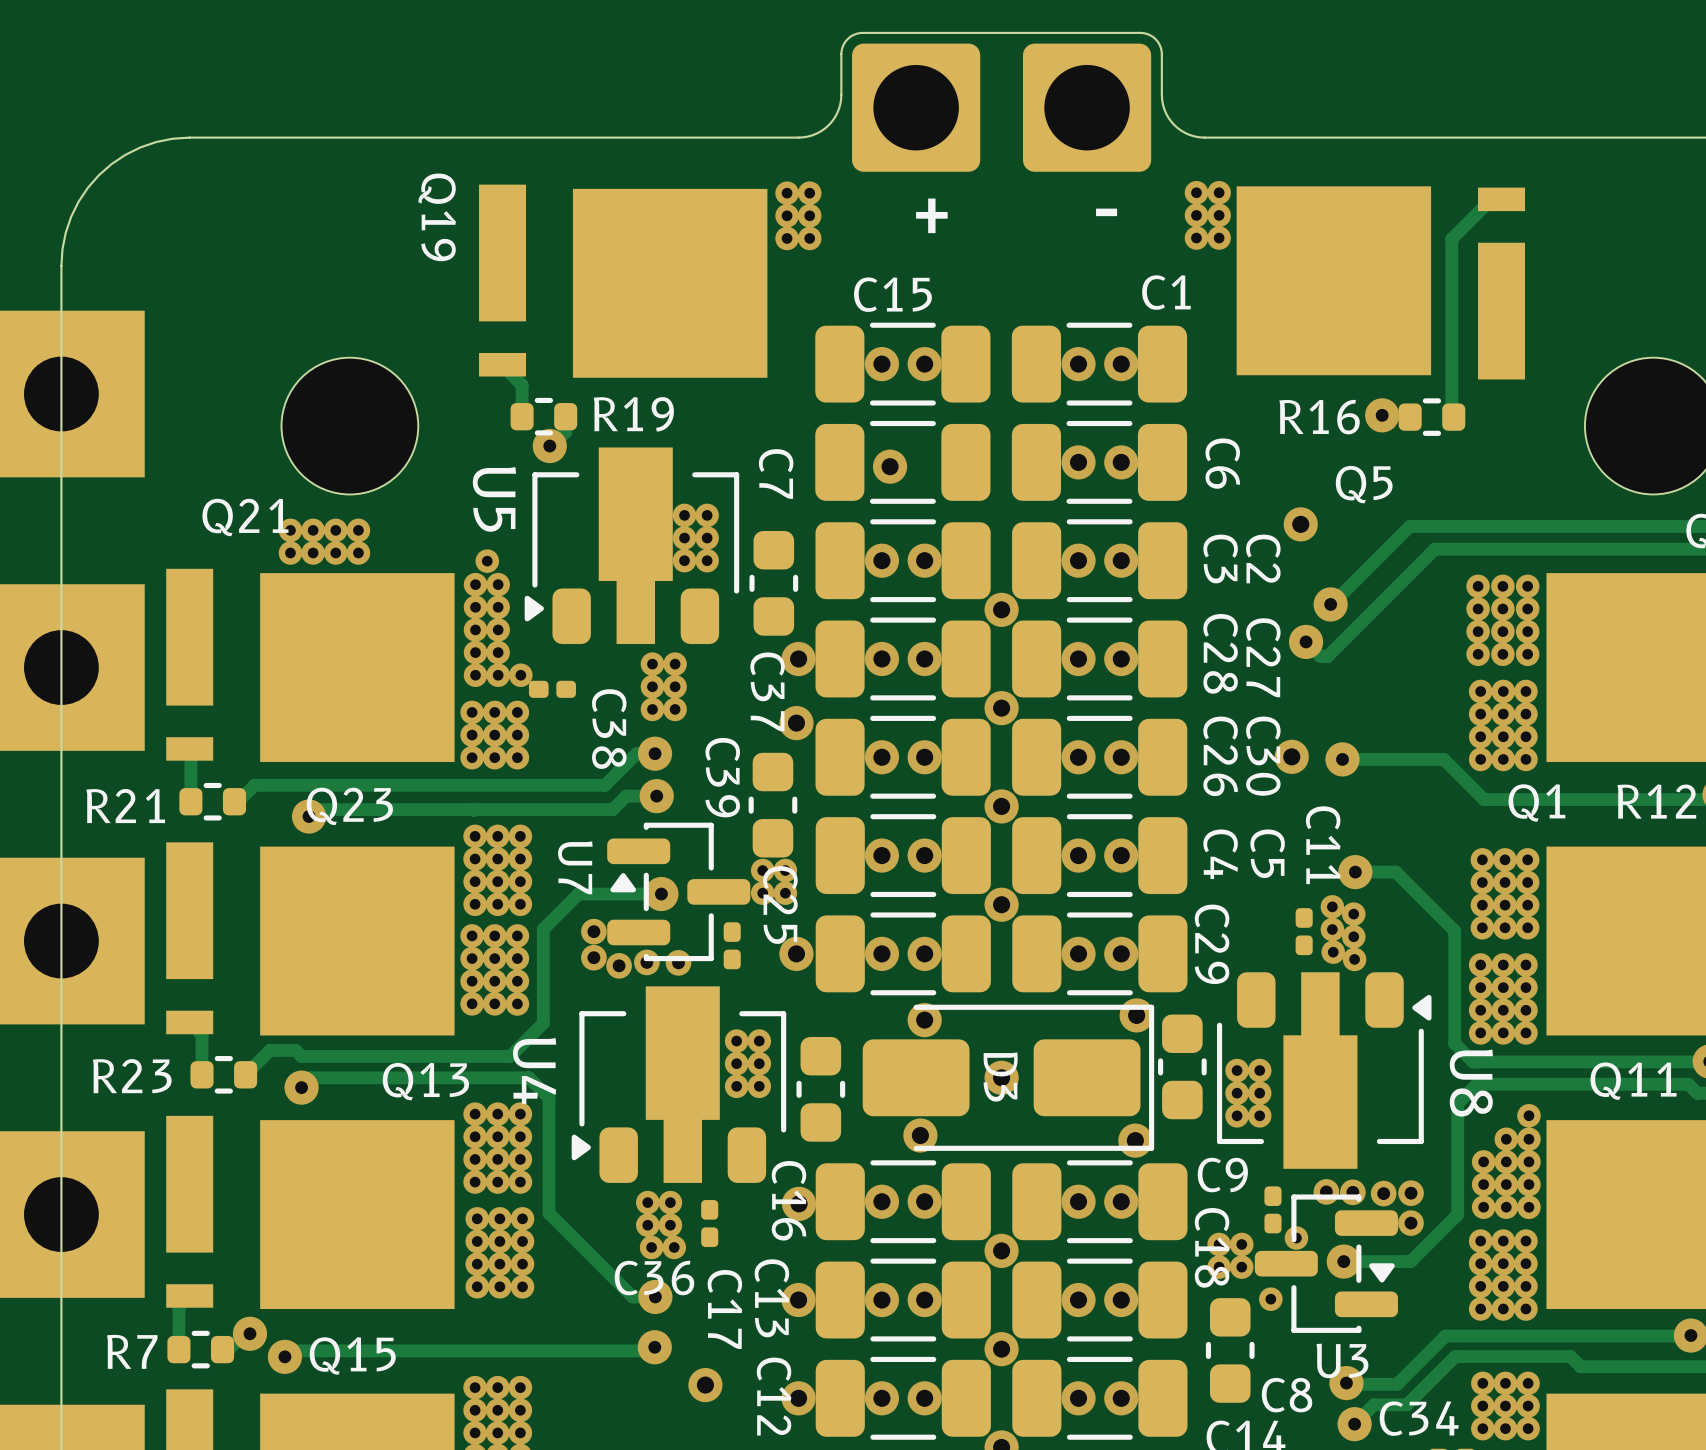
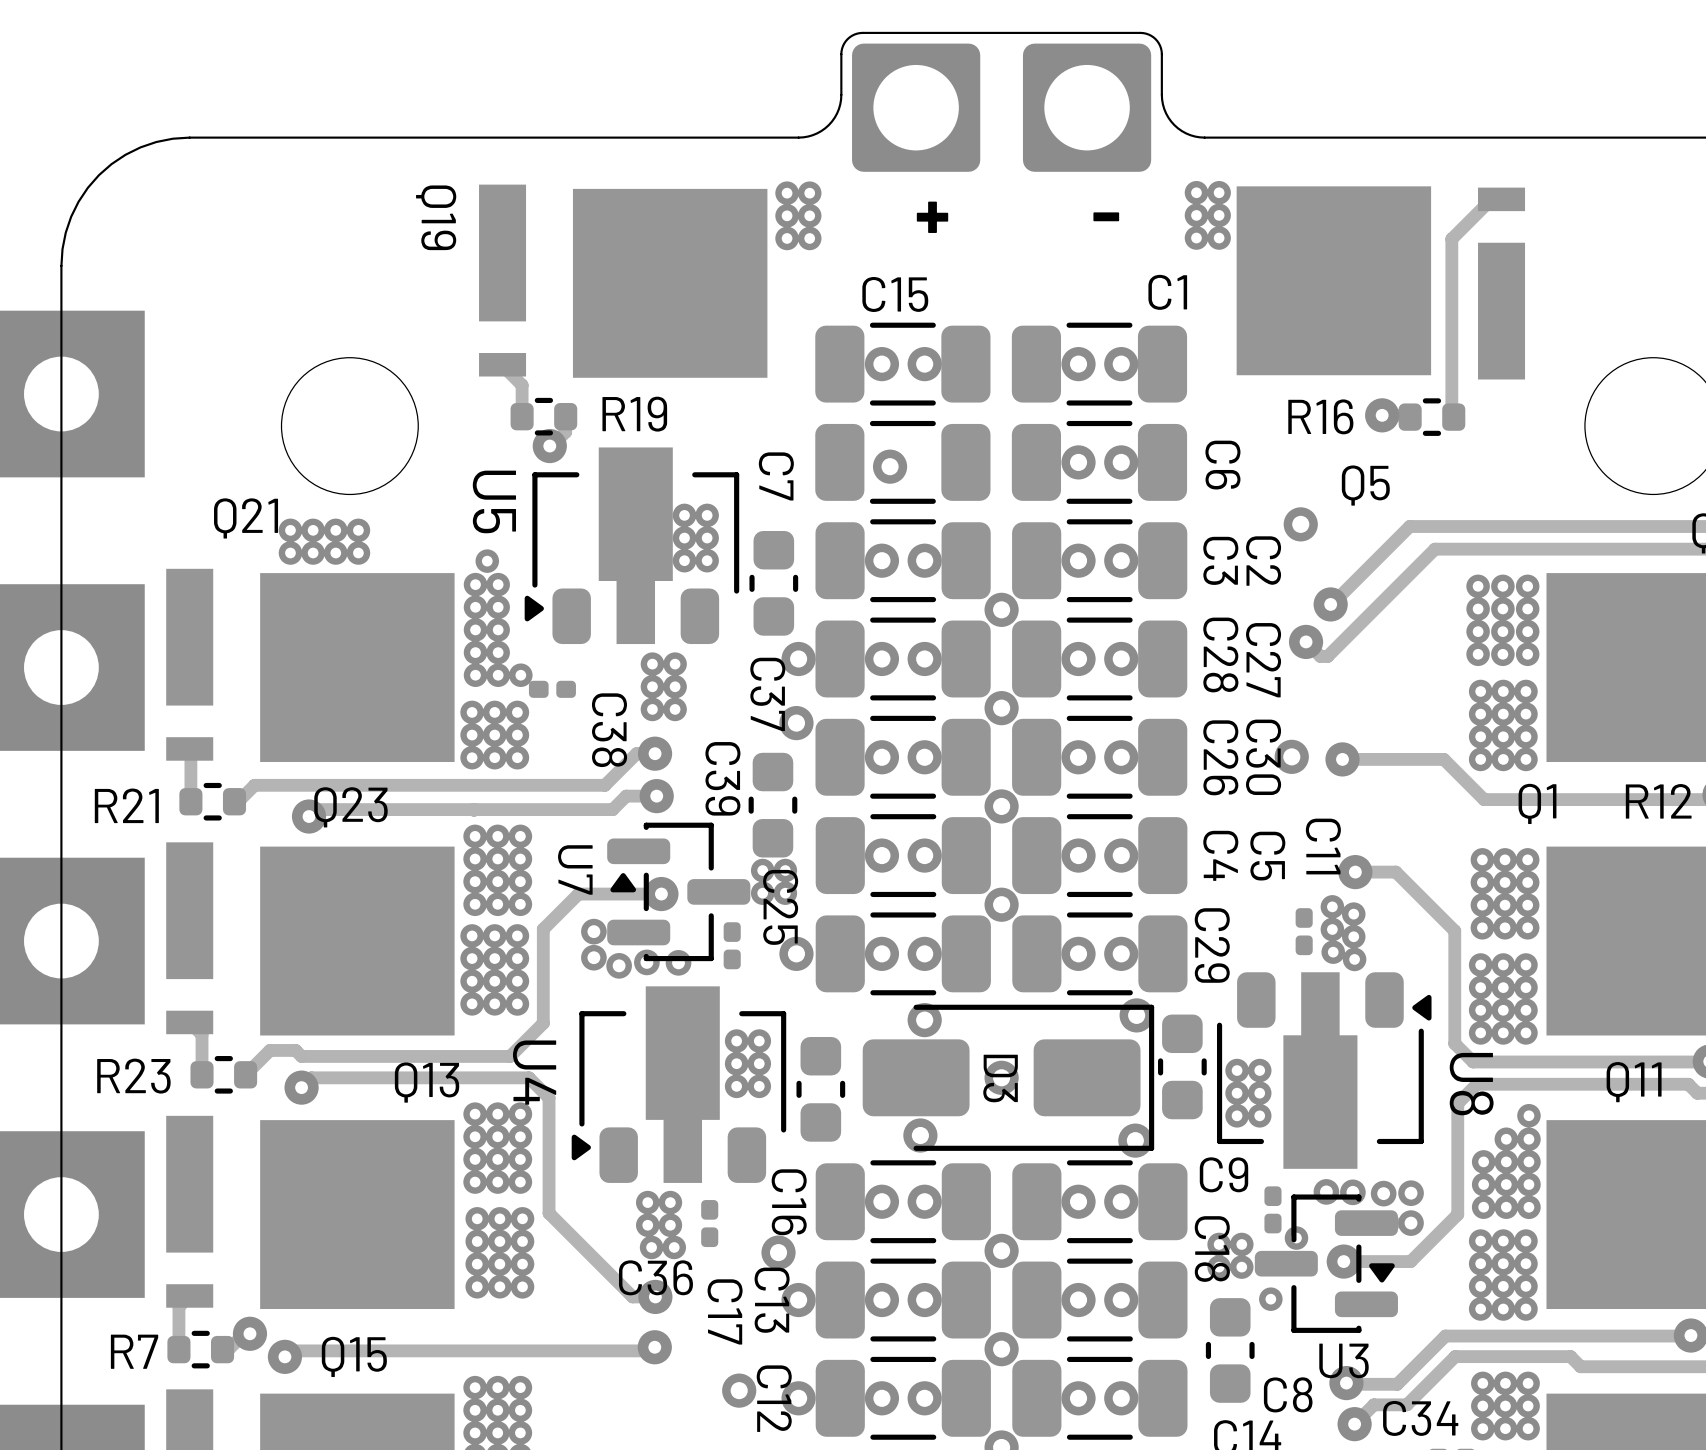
via position: (799, 1203) -> (778, 1252)
via position: (705, 1385) -> (739, 1390)

